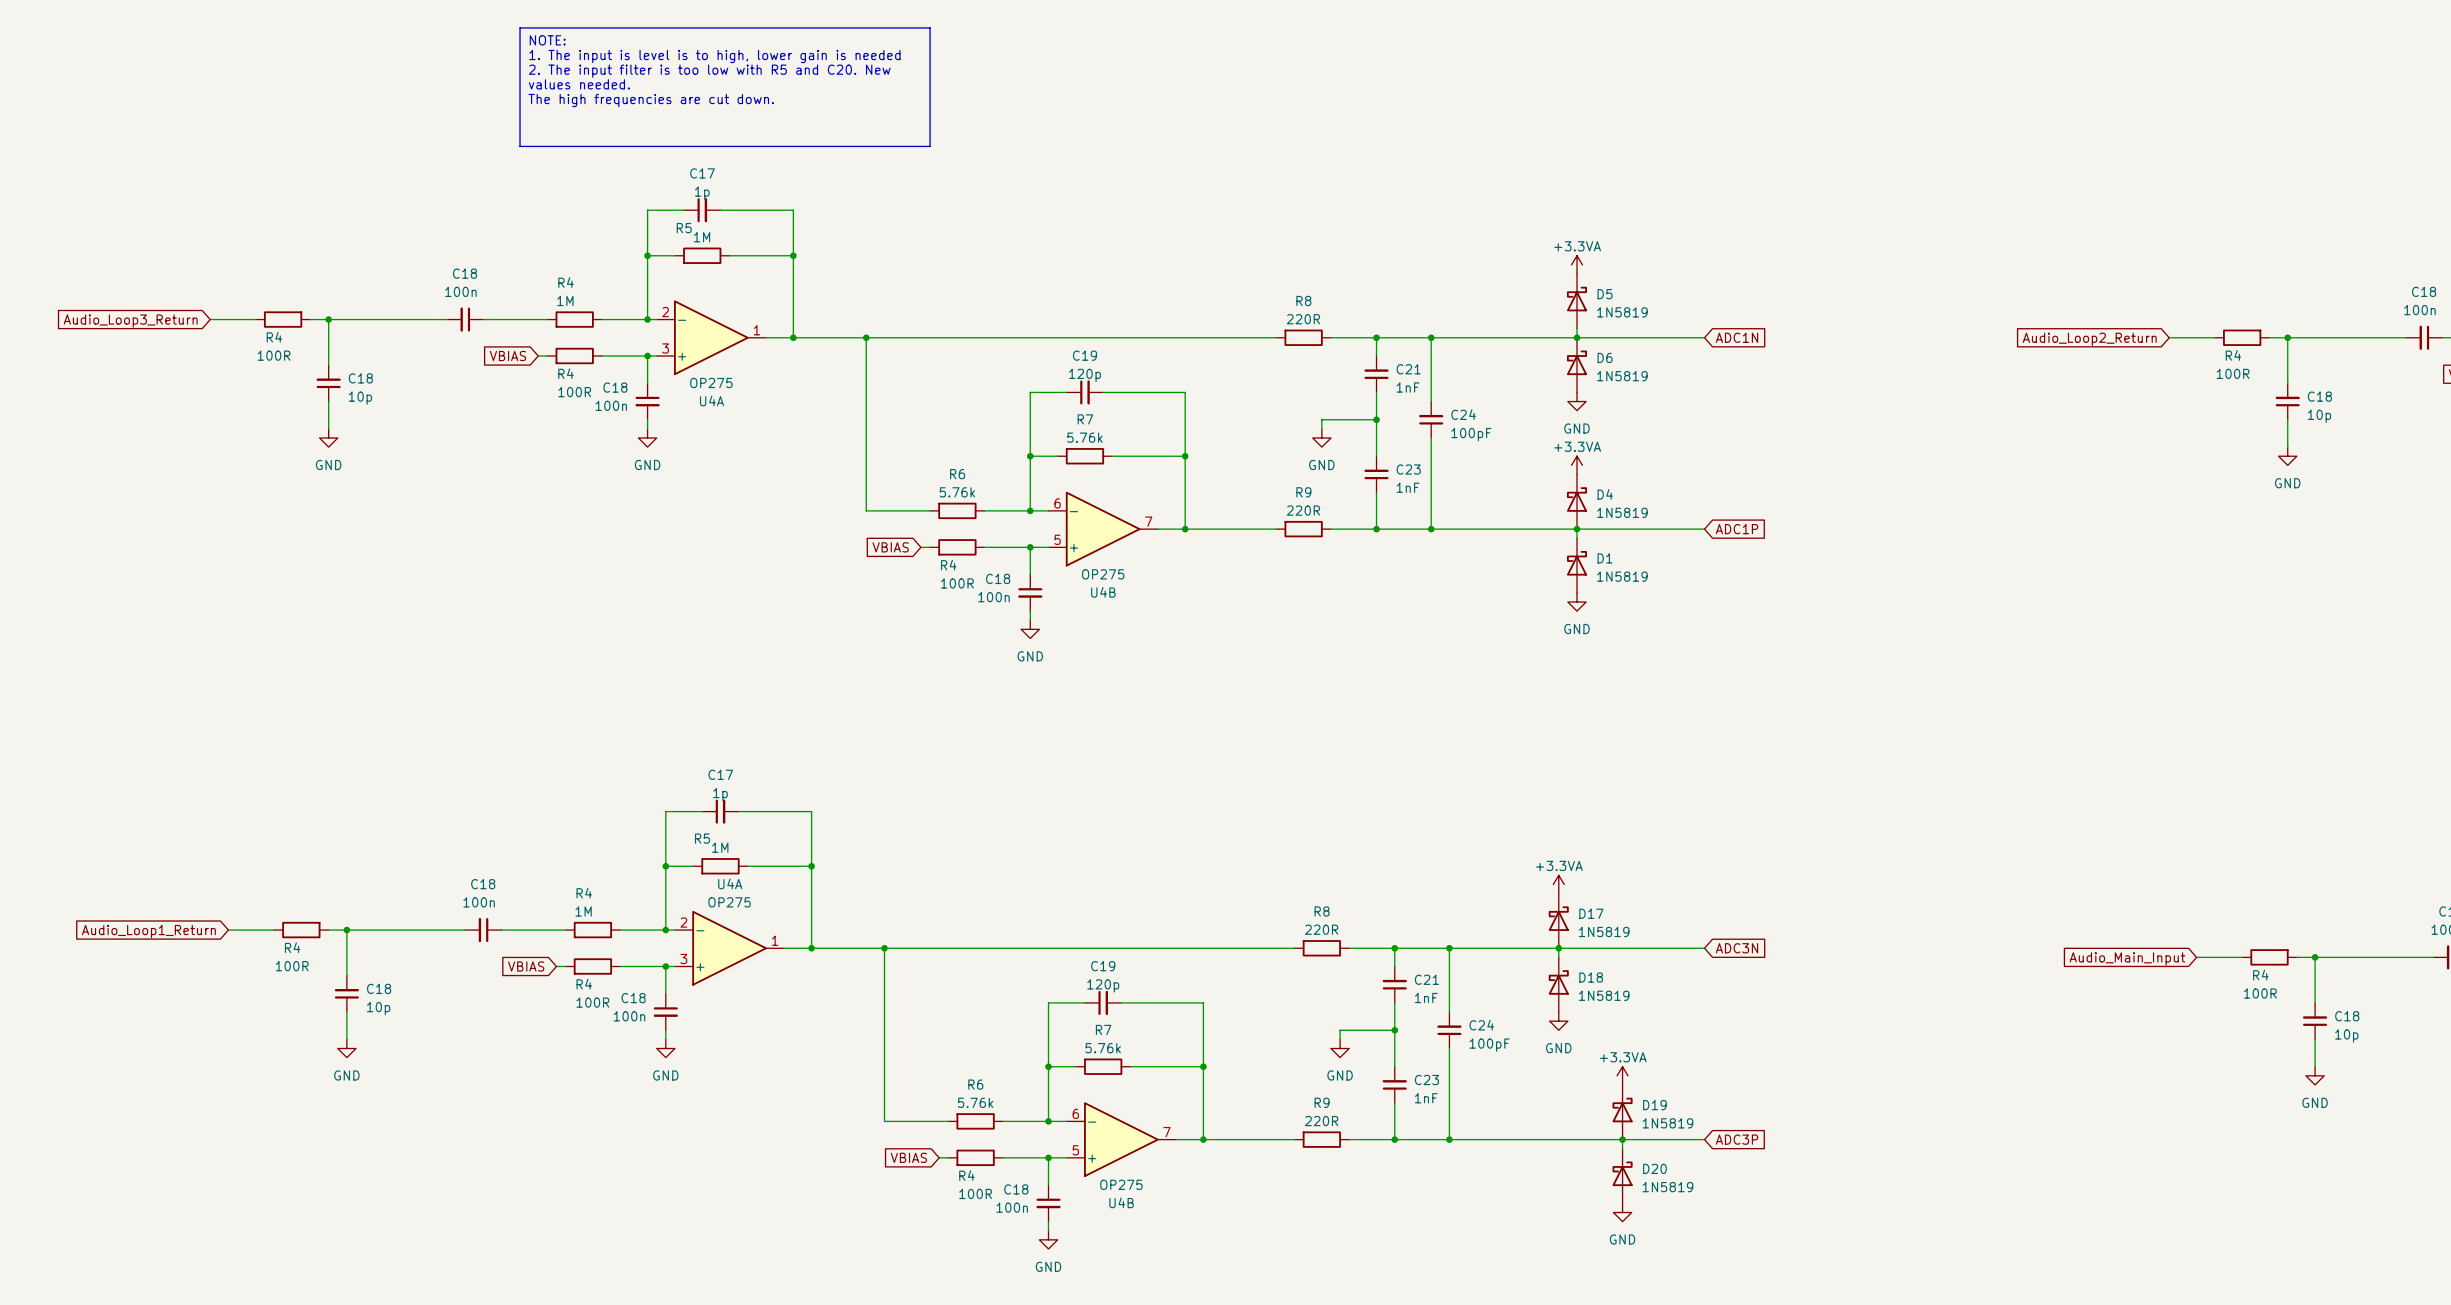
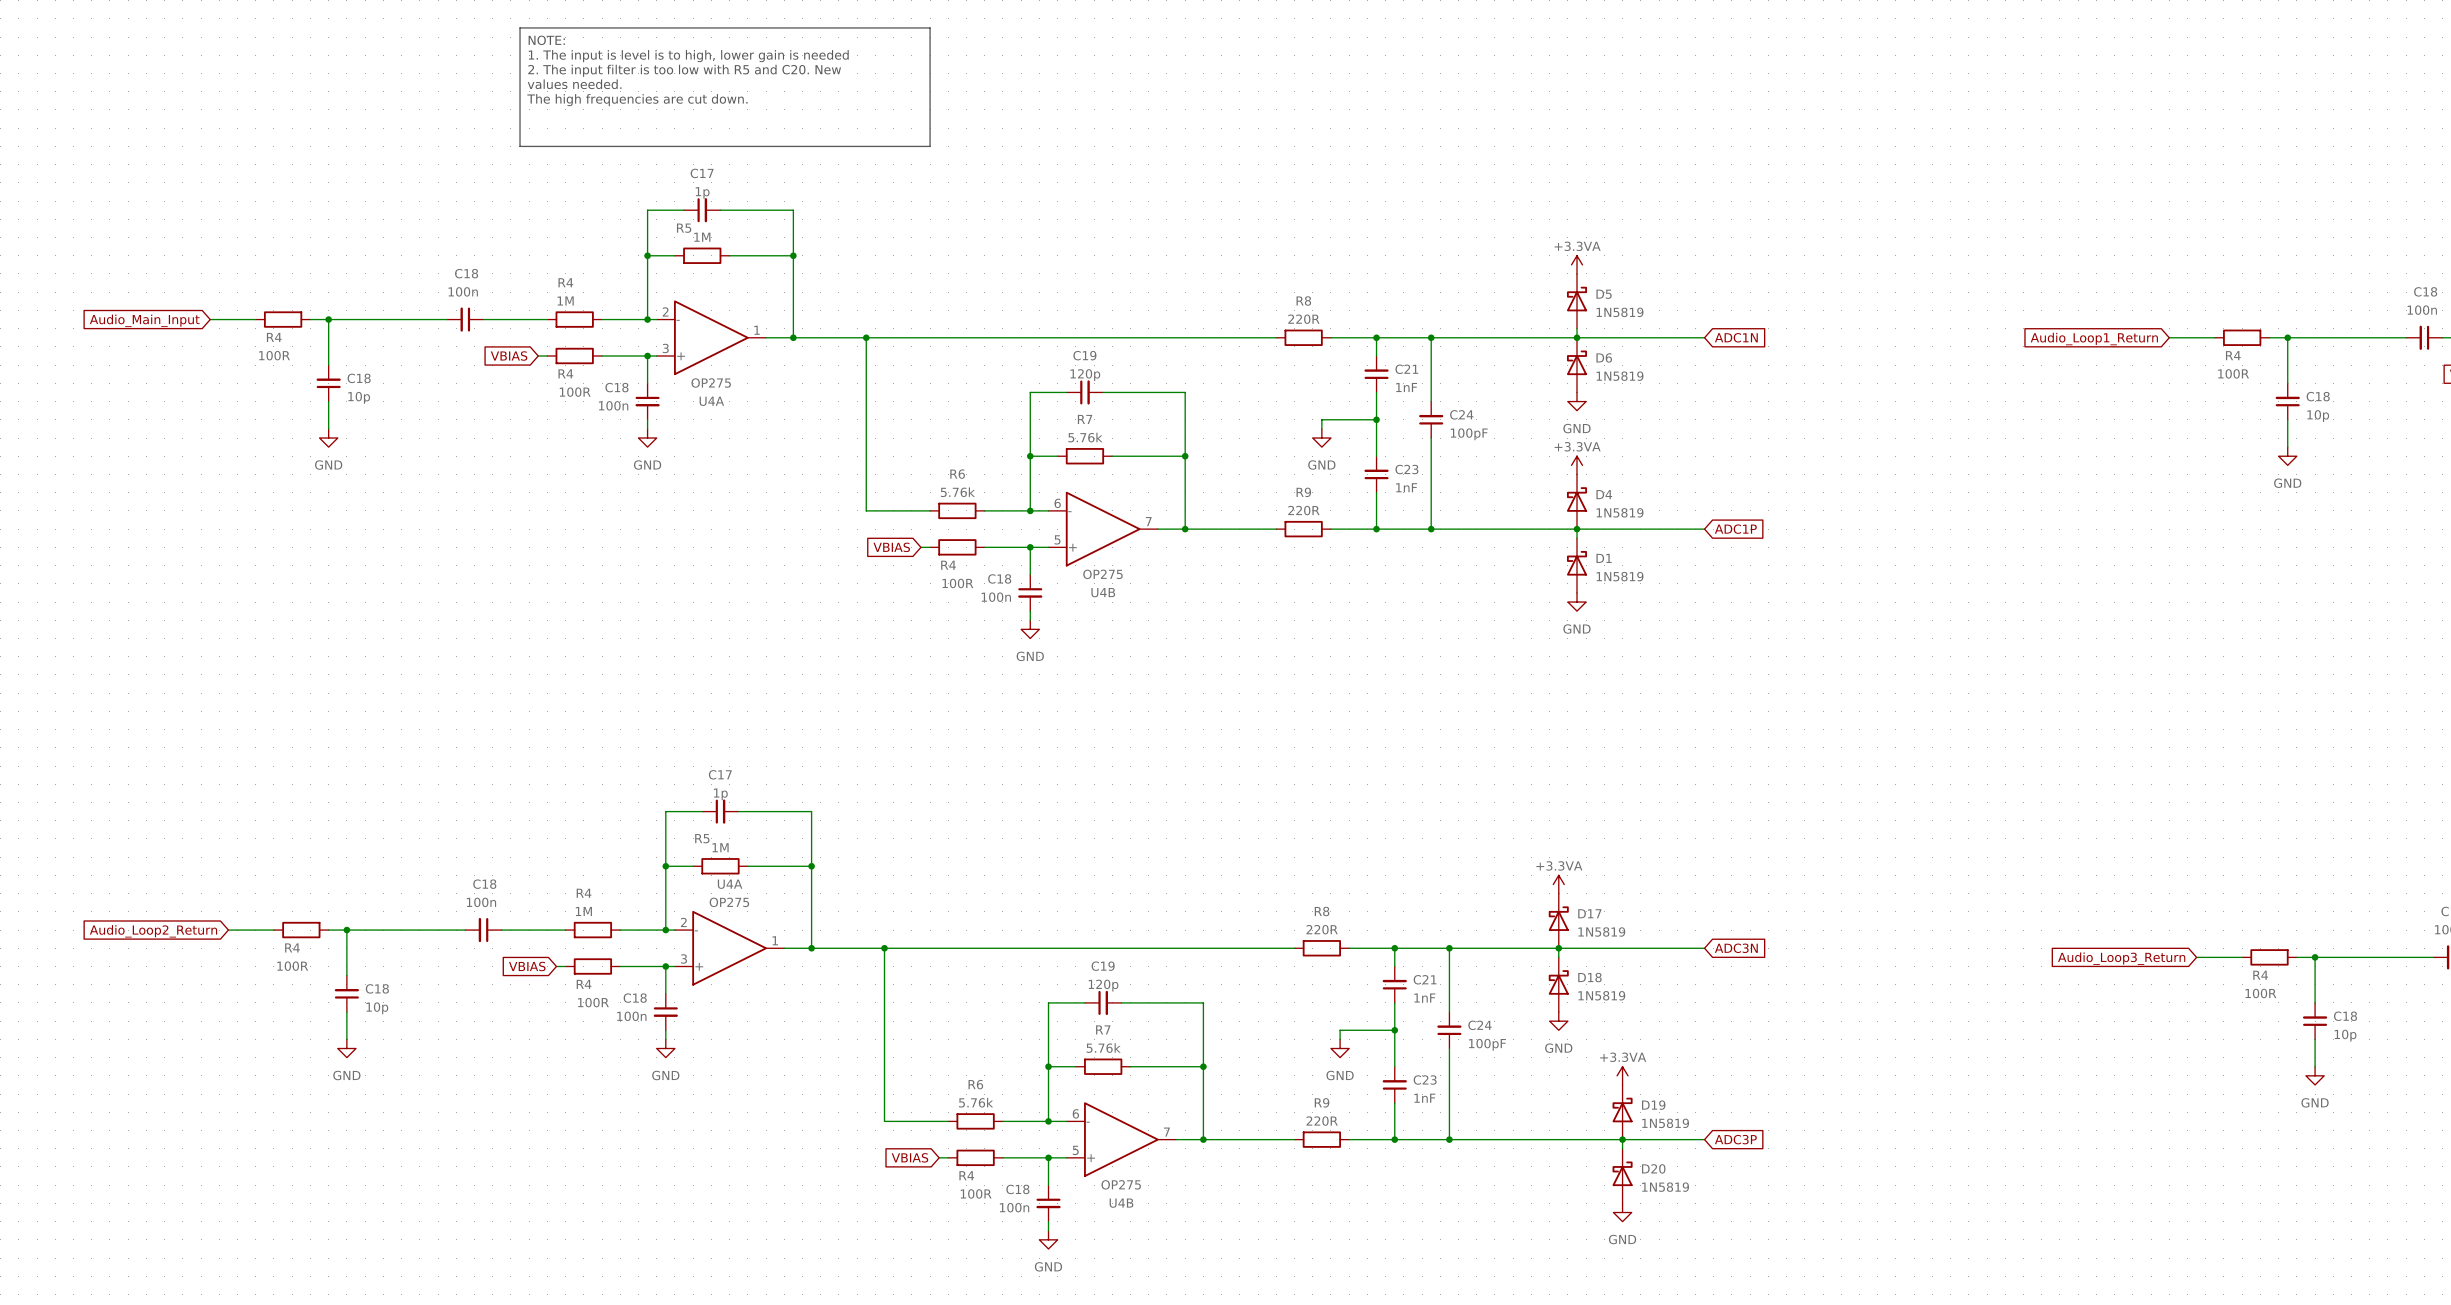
global label: Audio_Loop3_Return (130, 321) -> Audio_Main_Input (144, 320)
global label: Audio_Loop2_Return (2089, 339) -> Audio_Loop1_Return (2094, 339)
global label: Audio_Loop1_Return (148, 931) -> Audio_Loop2_Return (153, 931)
global label: Audio_Main_Input (2127, 958) -> Audio_Loop3_Return (2121, 958)

